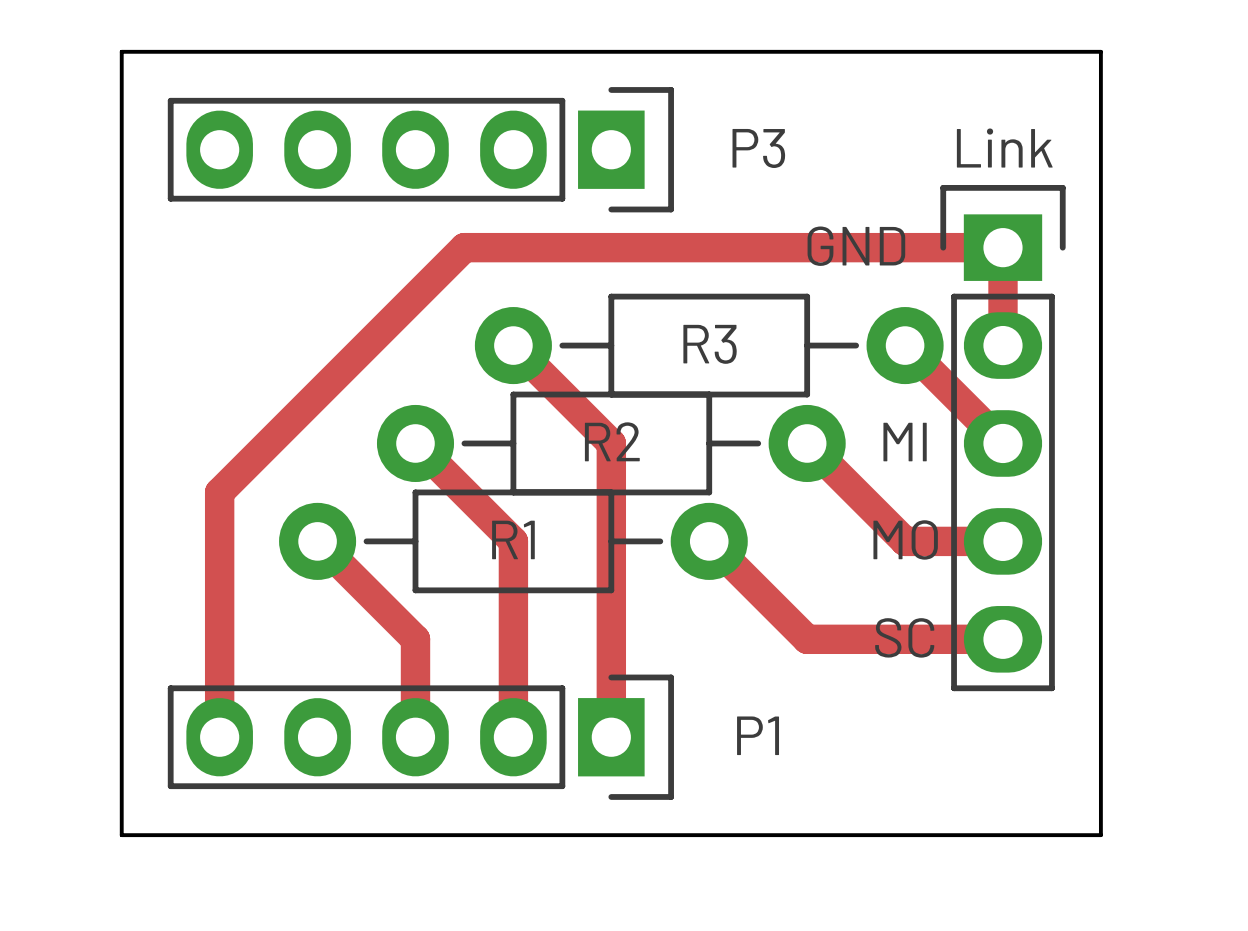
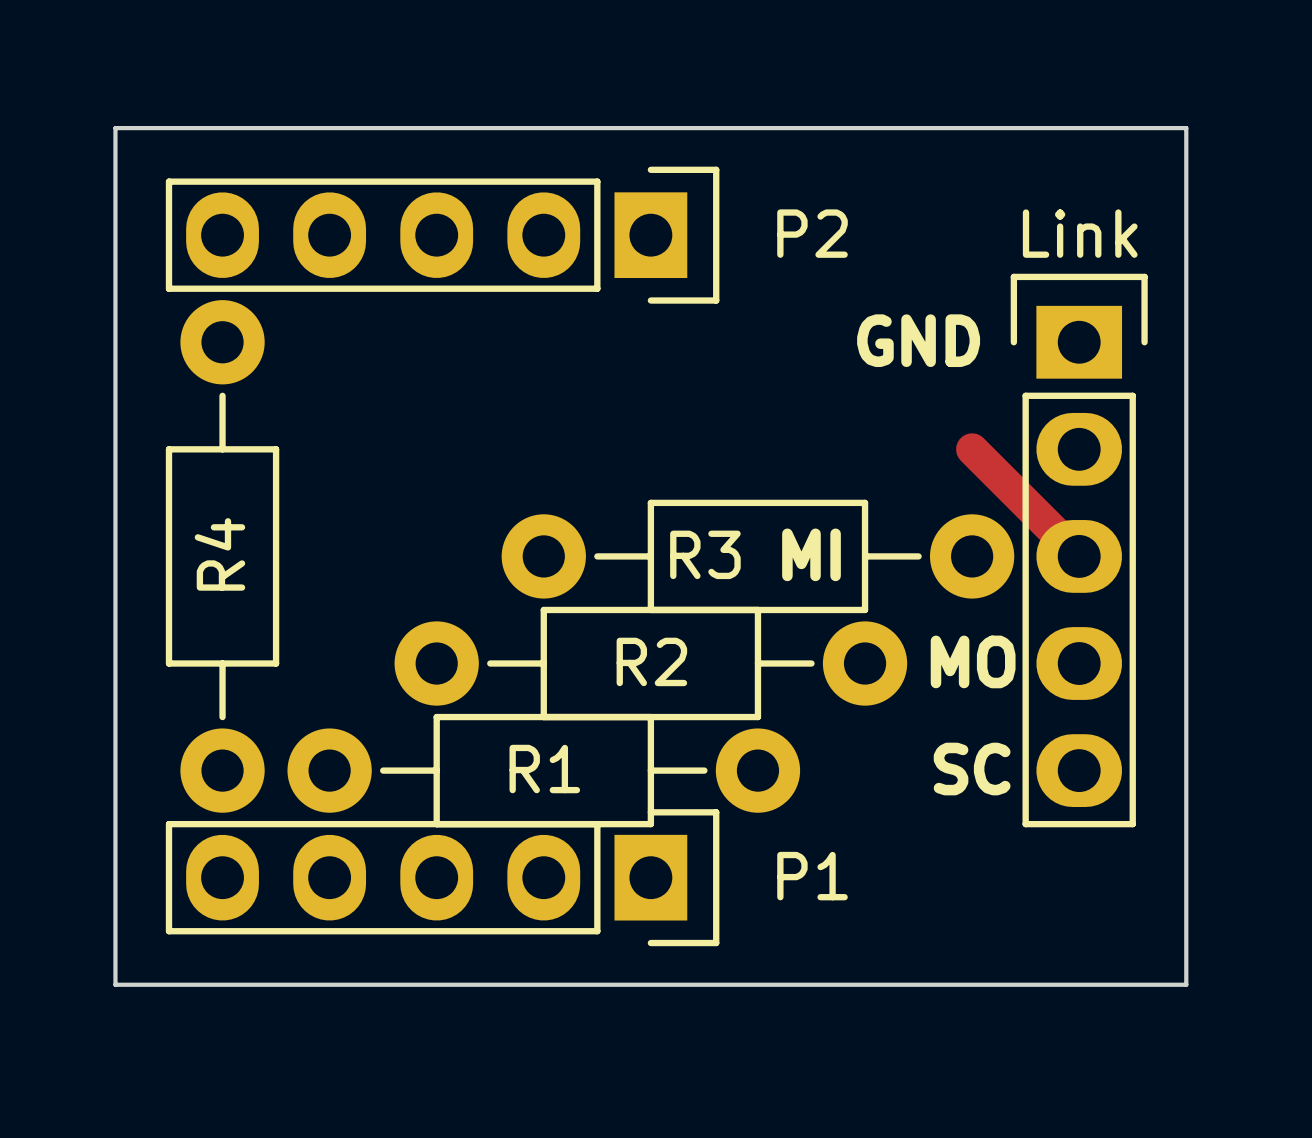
P3 name: P3 (758, 148) -> P2 (812, 233)
R3 name position: R3 (710, 344) -> R3 (705, 554)
track: (513, 345) (611, 443) (611, 737) -> none
R3 position: (709, 345) -> (757, 556)
track: (1002, 345) (1002, 247) (464, 247) (219, 492) (219, 737) -> none
text position: MI (905, 442) -> MI (811, 554)
R4: none -> (222, 556)
track: (415, 443) (513, 541) (513, 737) -> none
R2 position: (611, 443) -> (650, 663)
track: (807, 443) (905, 541) (1002, 541) -> none
track: (317, 541) (415, 639) (415, 737) -> none
R1 position: (513, 541) -> (543, 770)
track: (709, 541) (807, 639) (1002, 639) -> none

